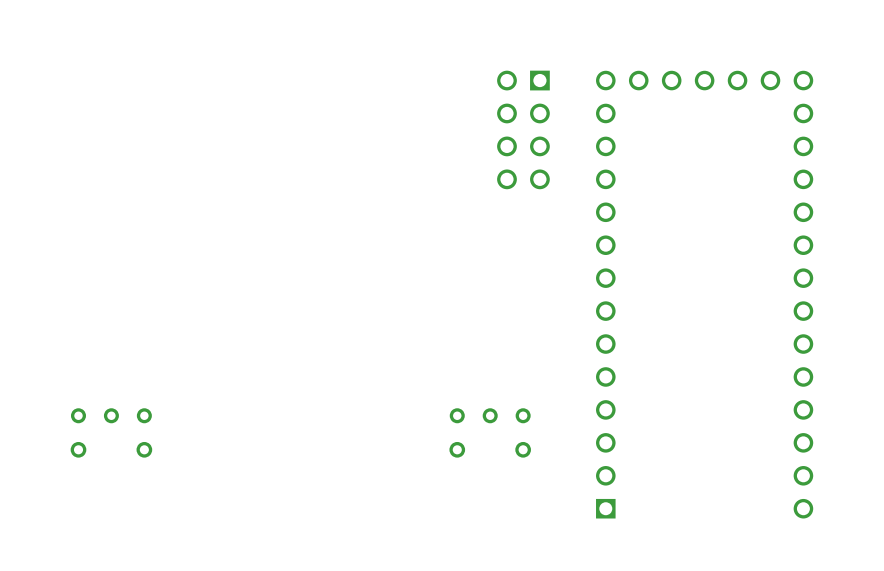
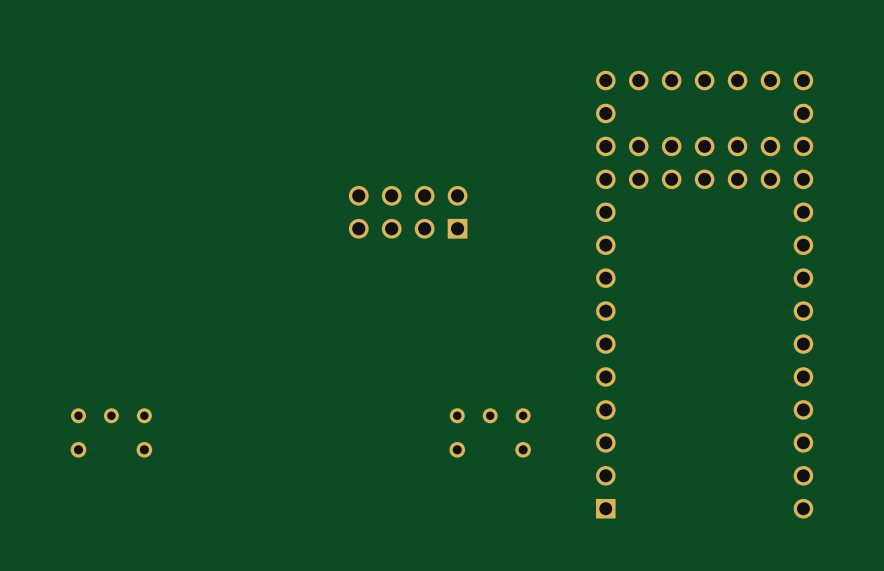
part footprint: [596, 70, 814, 519] -> [596, 70, 814, 519]
part rotation: 0° (523, 129) -> 90° clockwise (408, 212)
part position: (523, 129) -> (408, 212)

